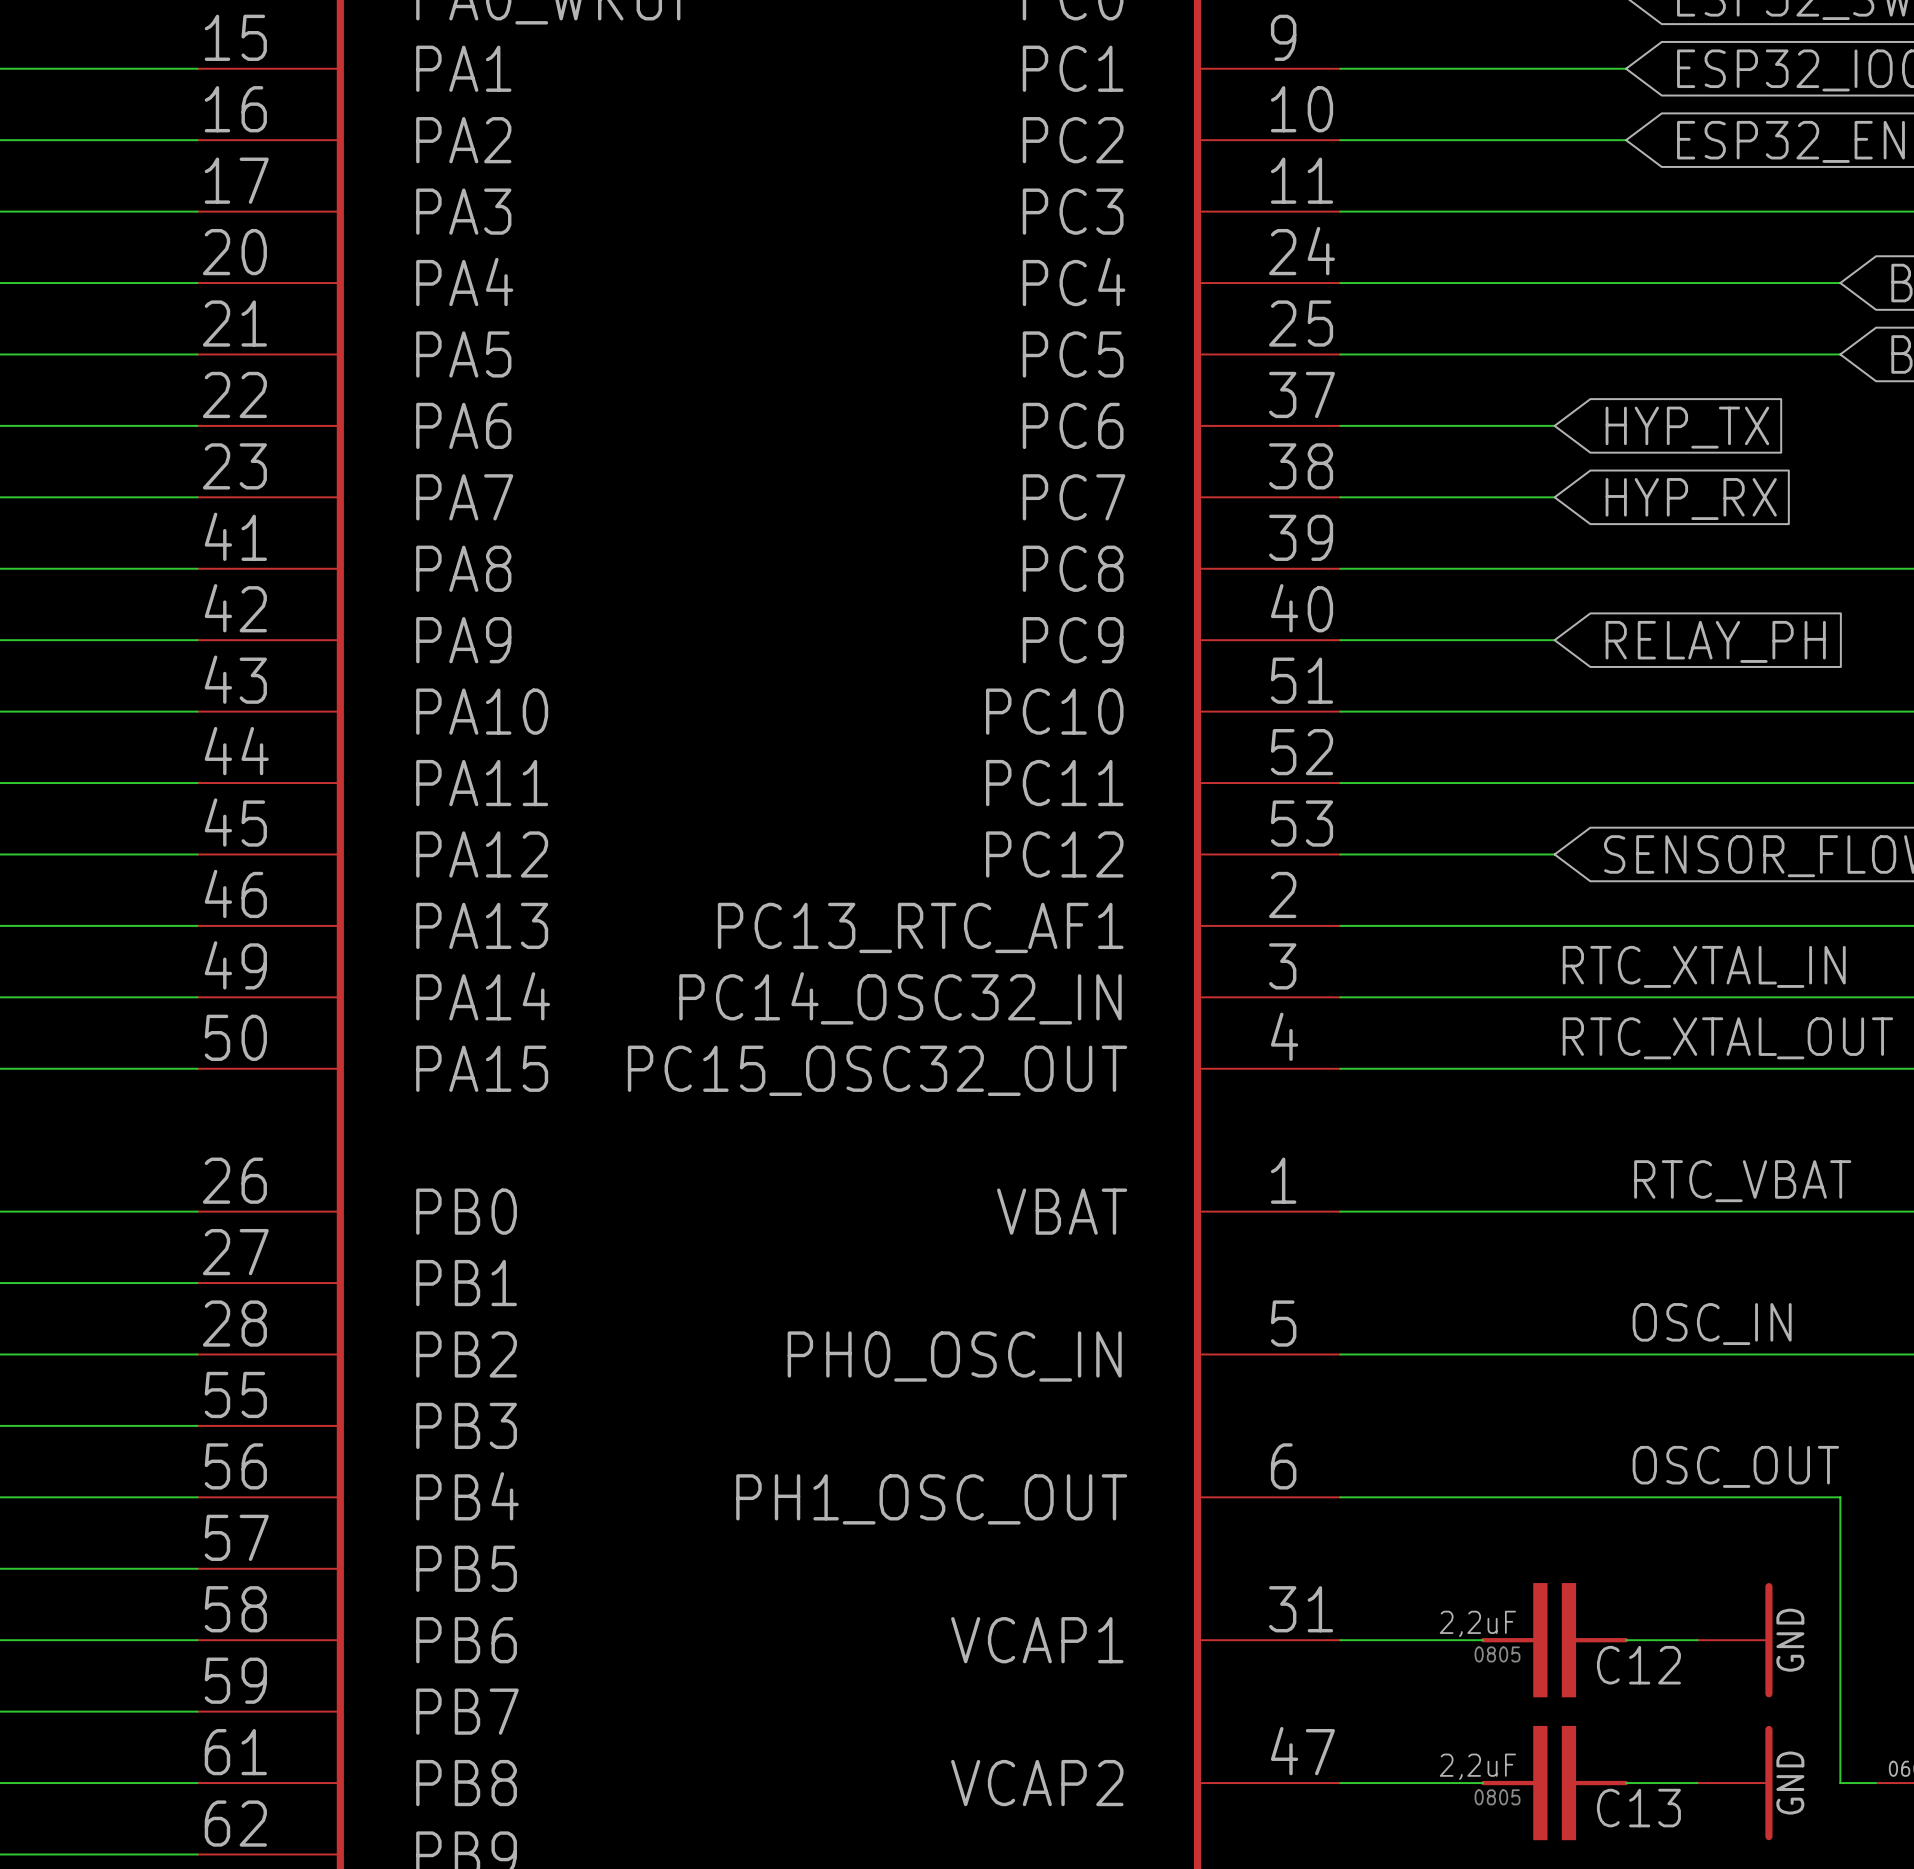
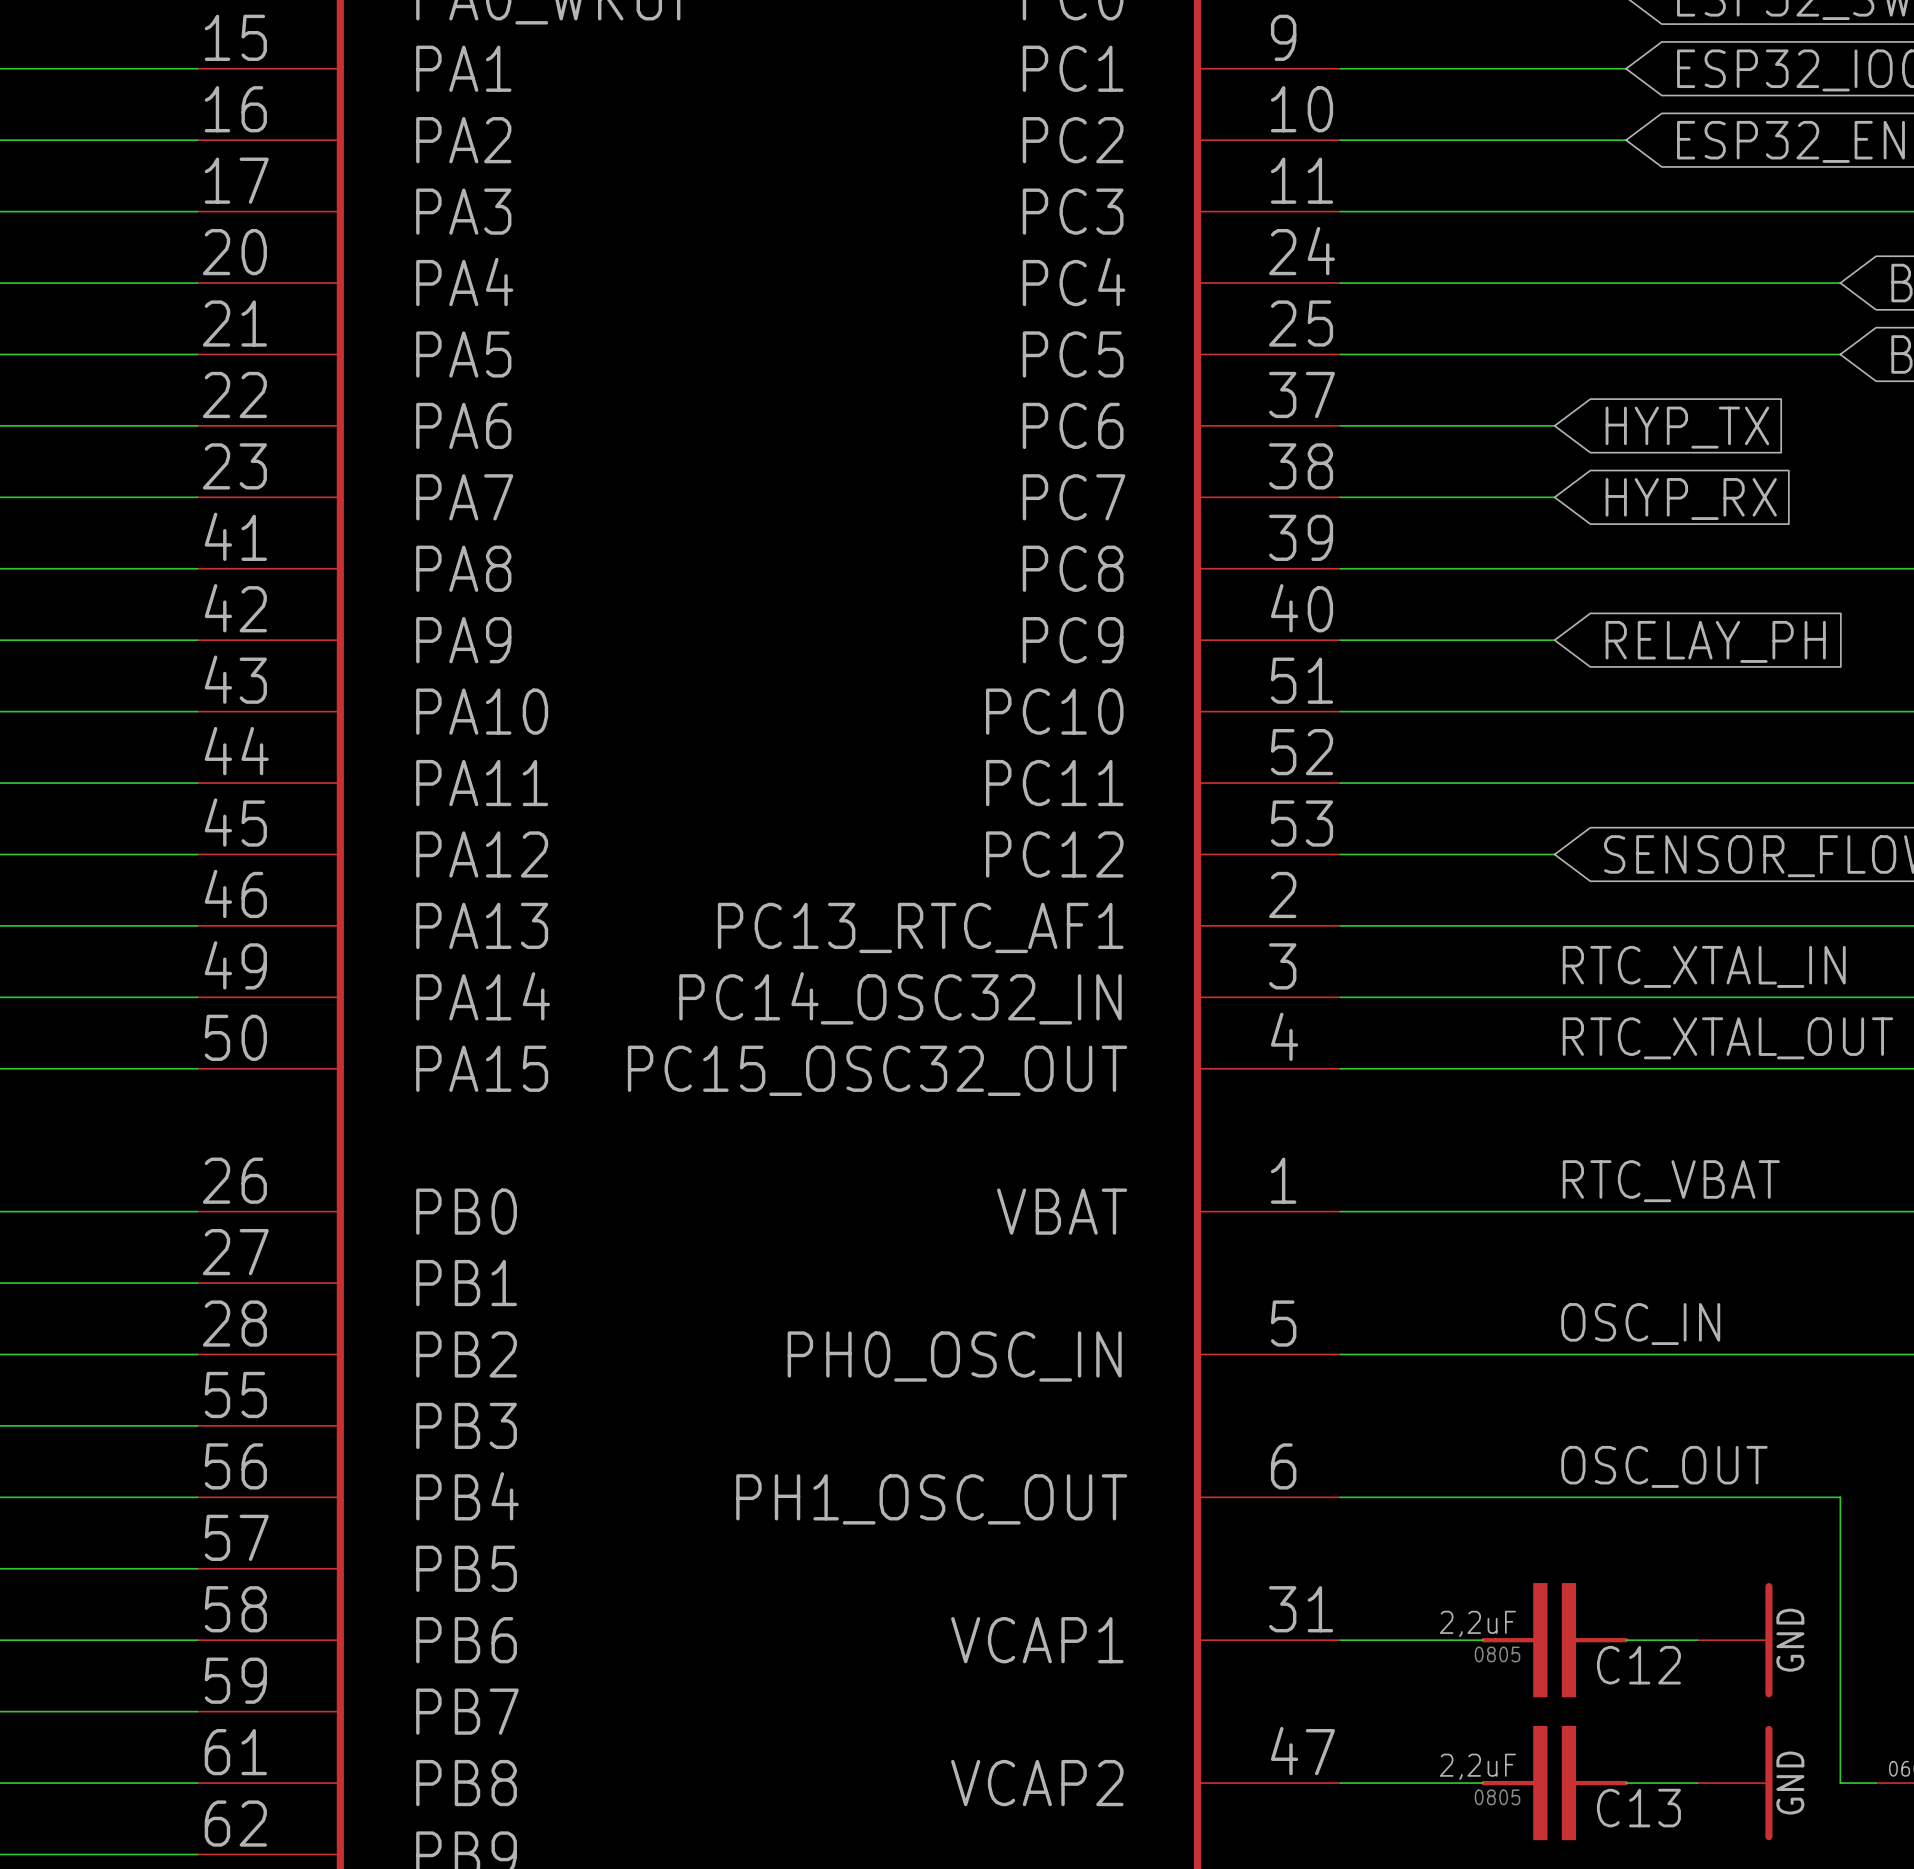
label position: RTC_VBAT (1742, 1181) -> RTC_VBAT (1671, 1181)
label position: OSC_IN (1712, 1324) -> OSC_IN (1640, 1324)
label position: OSC_OUT (1735, 1466) -> OSC_OUT (1664, 1466)

